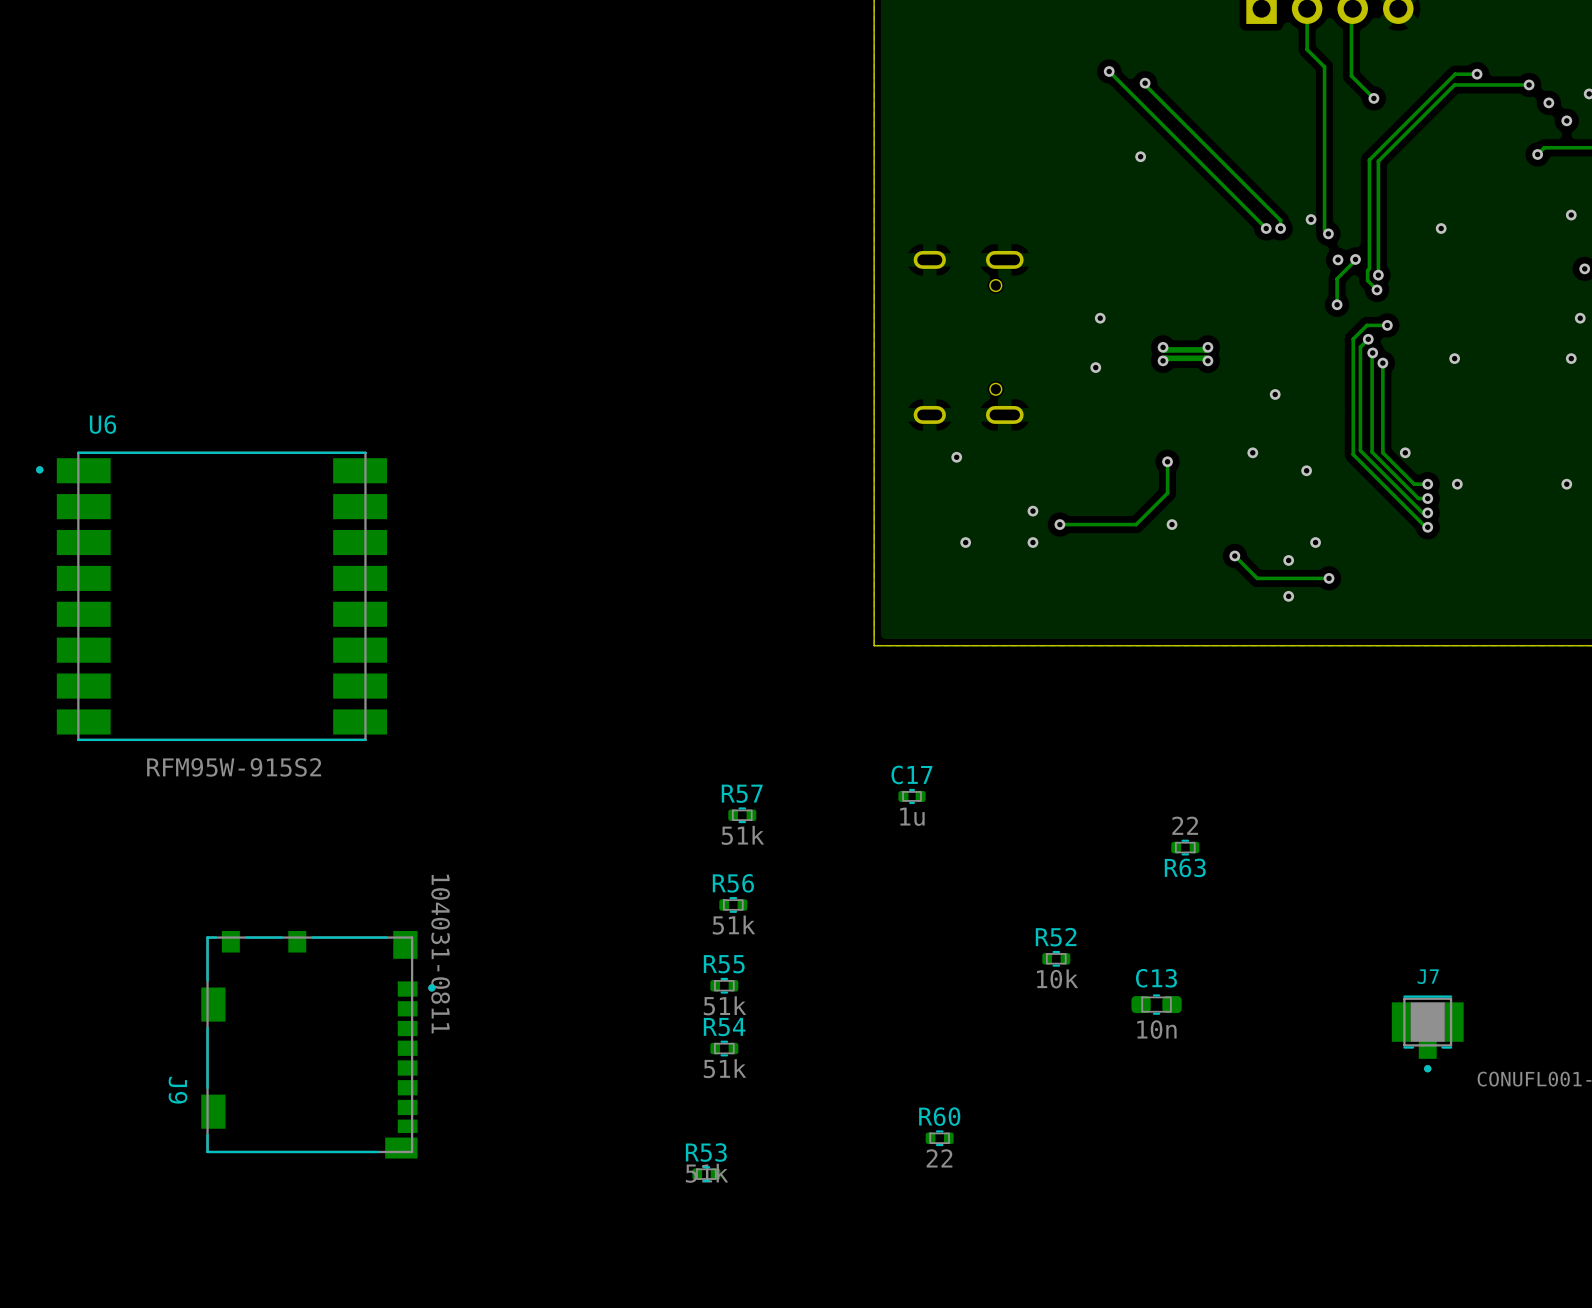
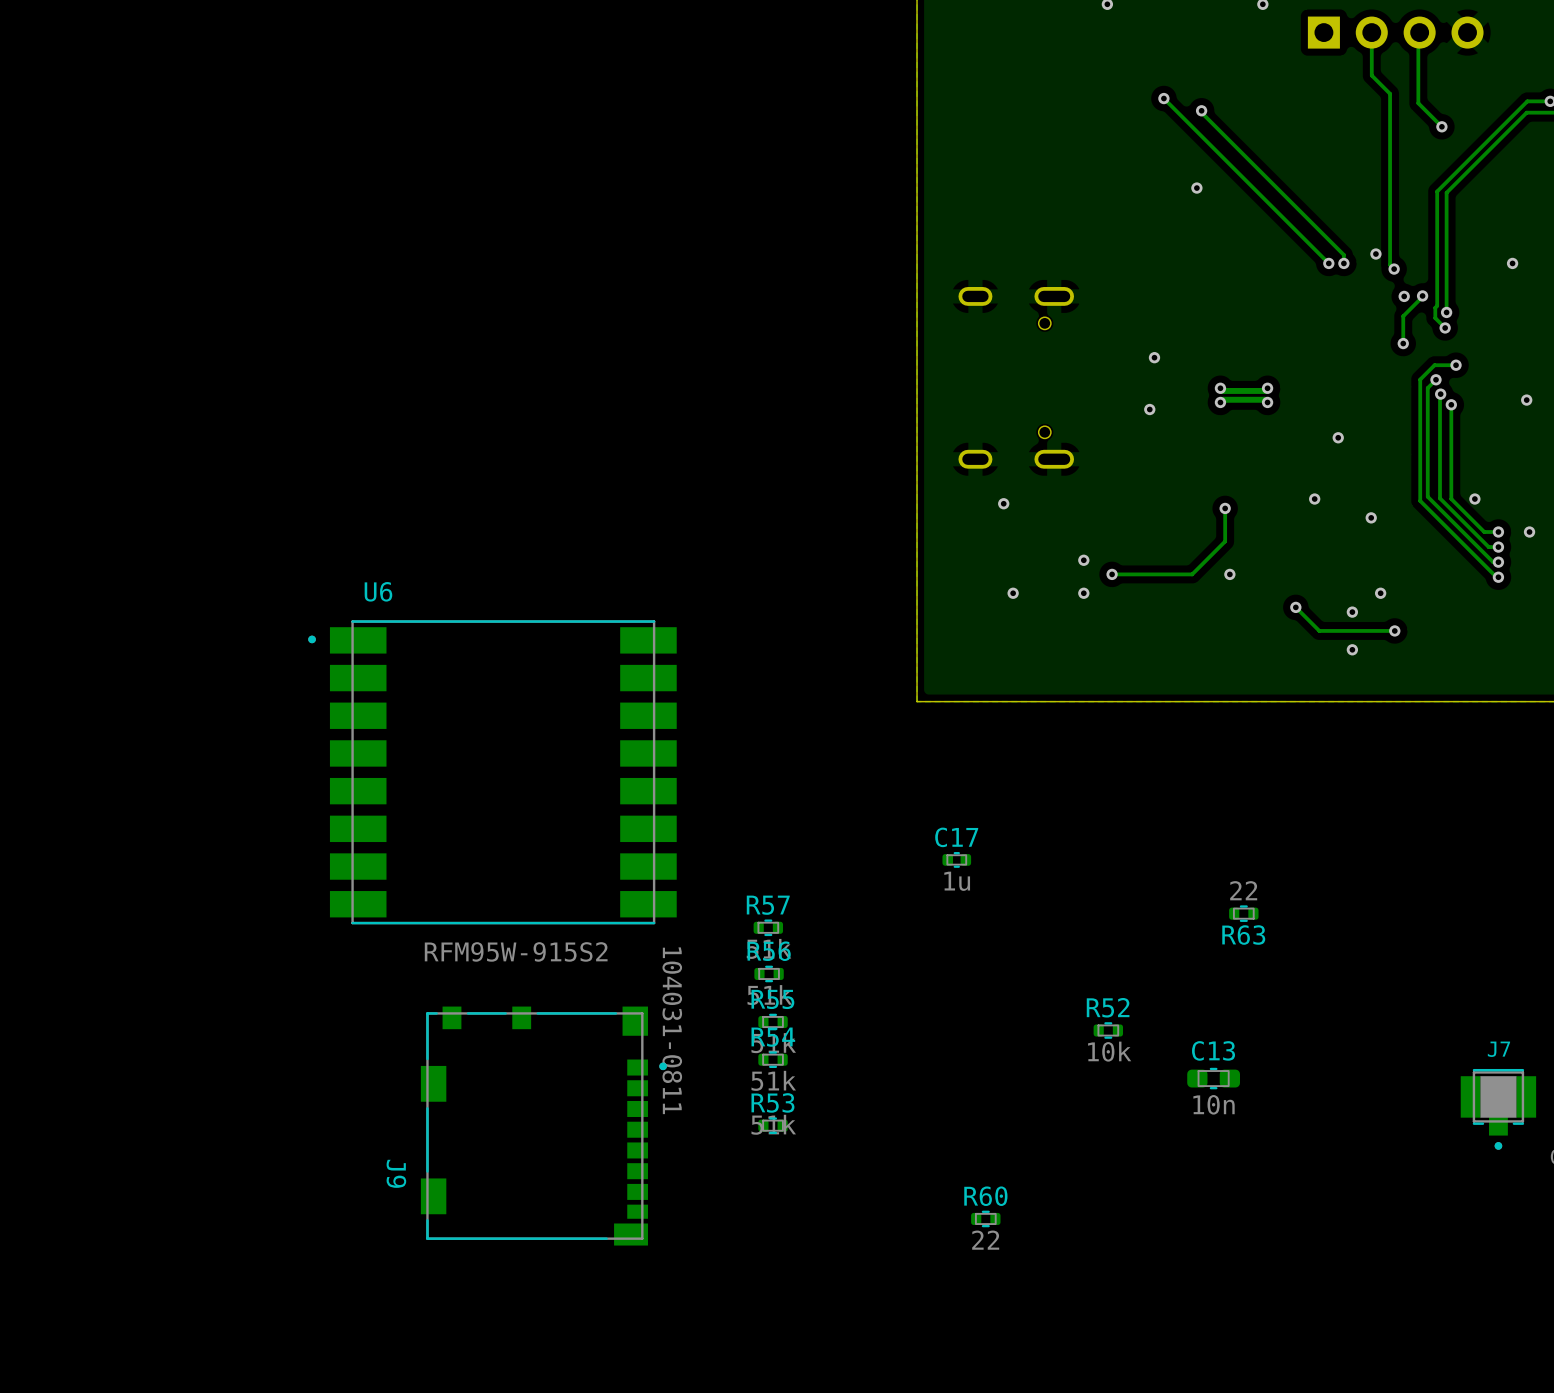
U6 position: (211, 596) -> (492, 772)
R57 position: (742, 815) -> (768, 927)
R55 position: (724, 985) -> (773, 1022)
J9 position: (318, 1044) -> (543, 1126)
R54 position: (724, 1048) -> (773, 1059)
R53 position: (706, 1174) -> (773, 1125)

